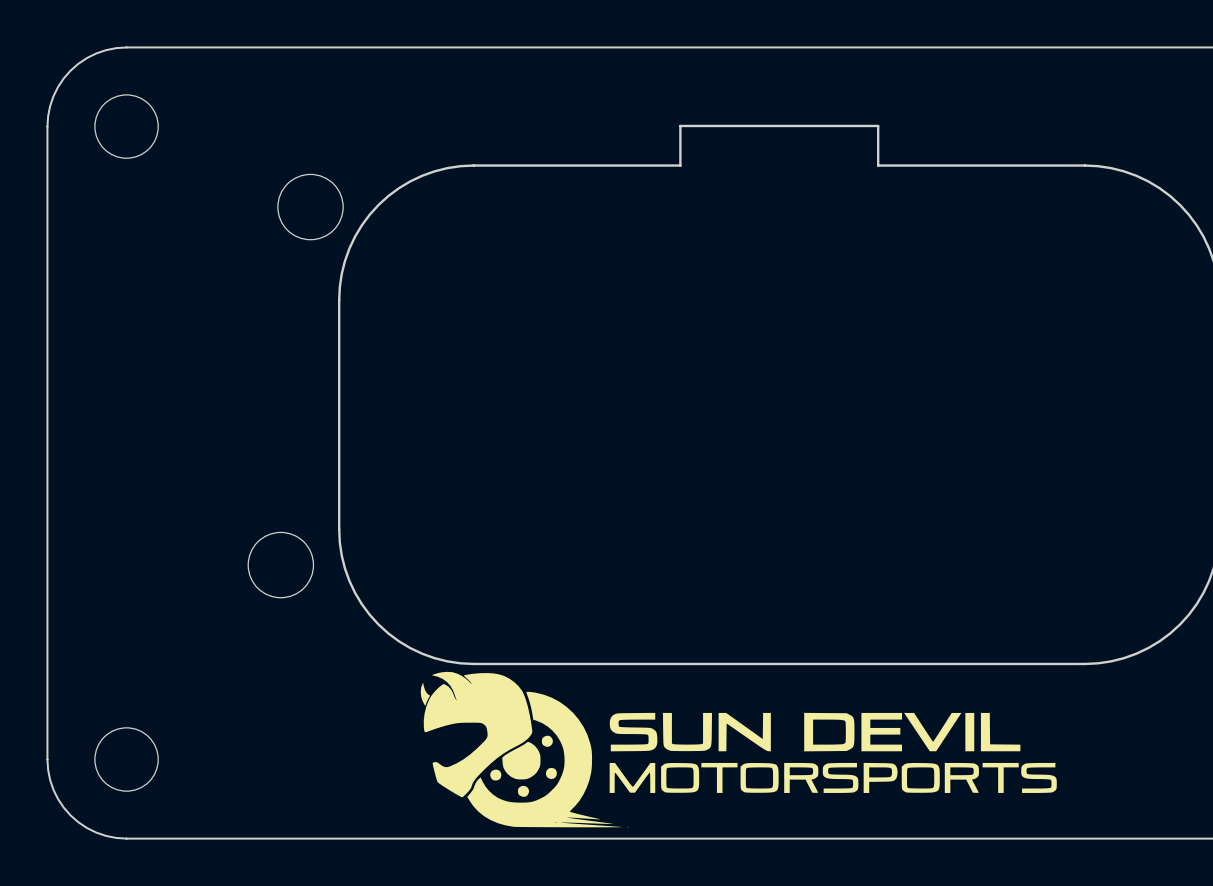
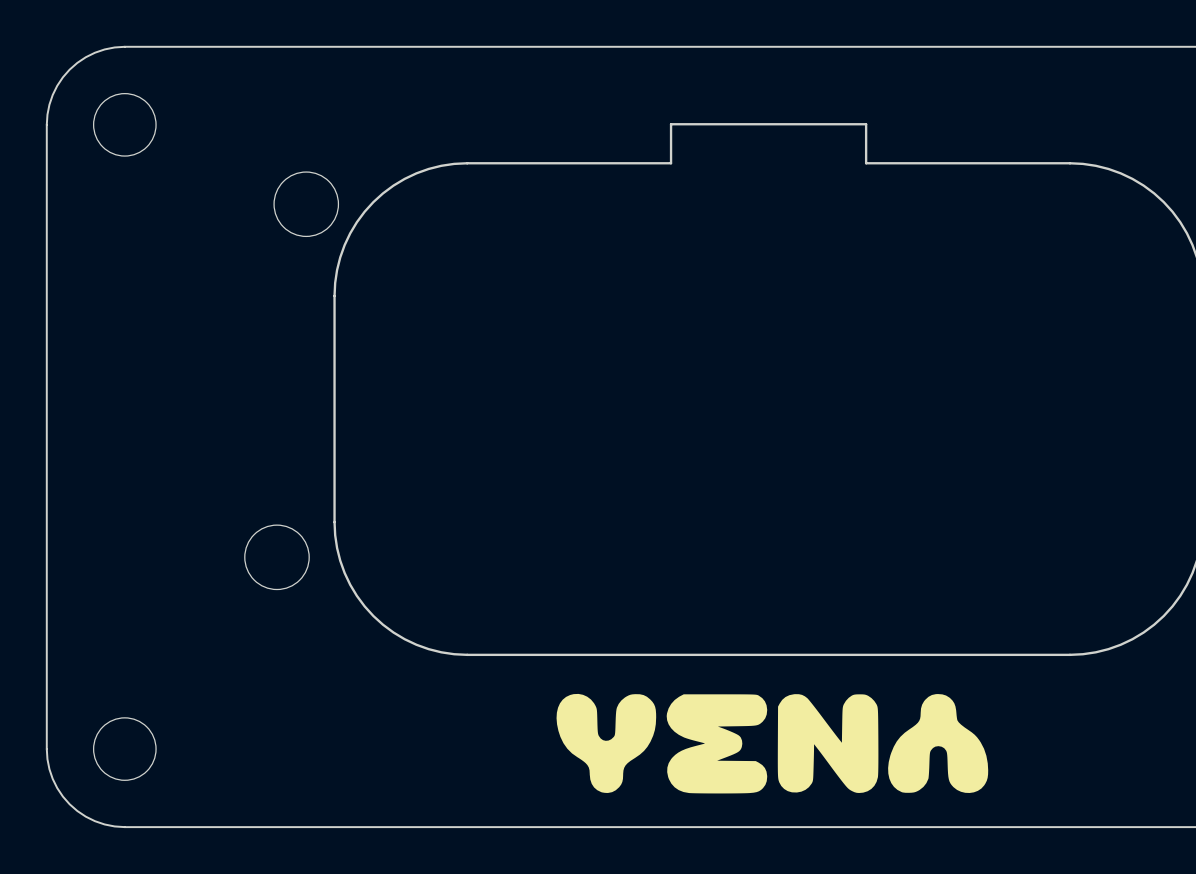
drawing: [420, 671, 1057, 828] -> none
drawing: none -> [556, 693, 989, 794]

